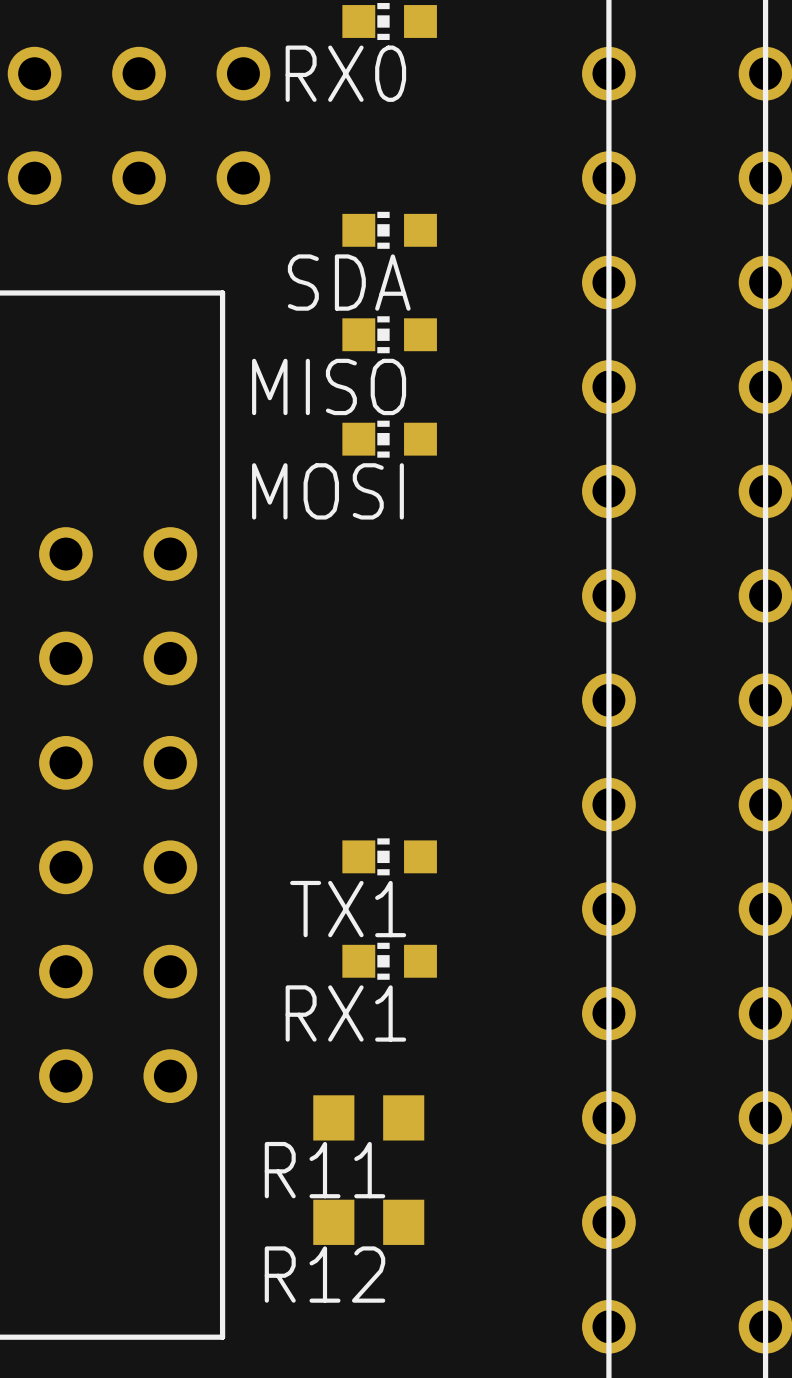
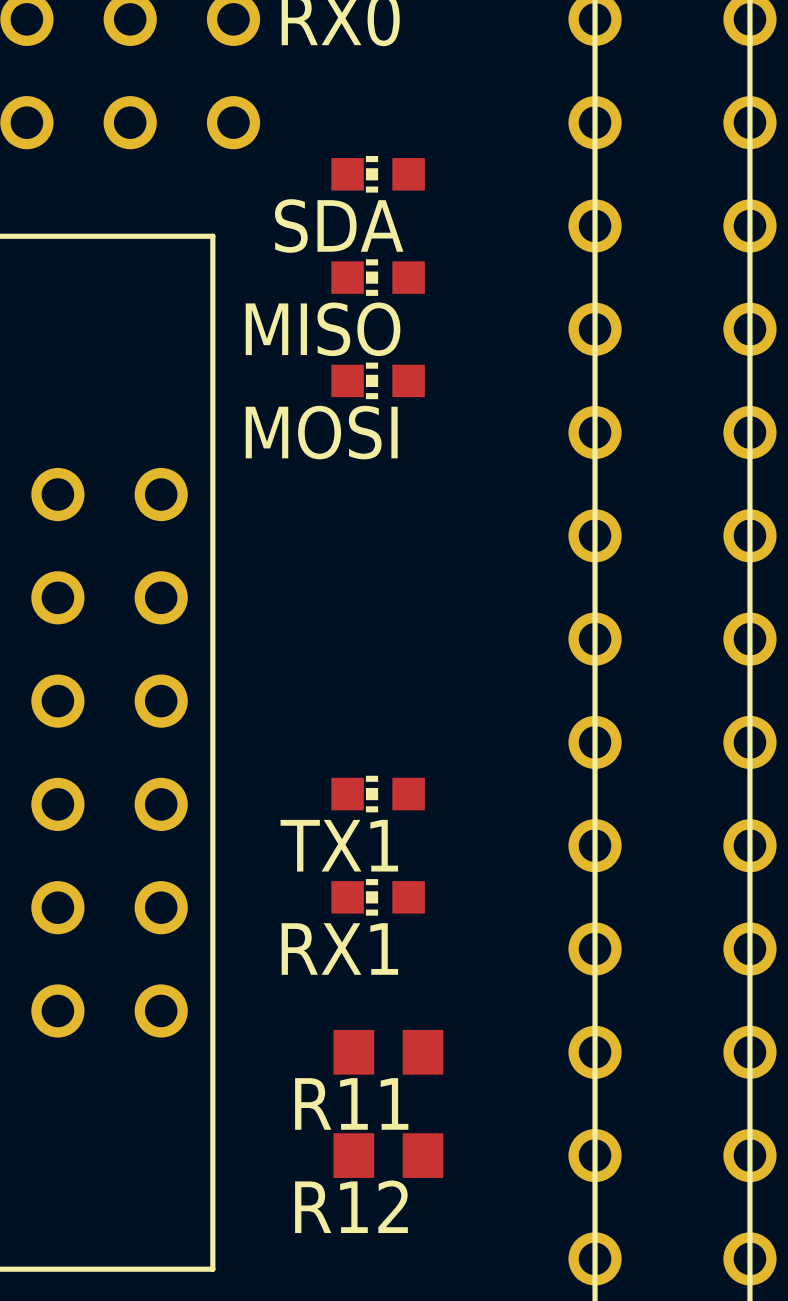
R11 position: (368, 1117) -> (388, 1052)
R12 position: (368, 1222) -> (388, 1155)

